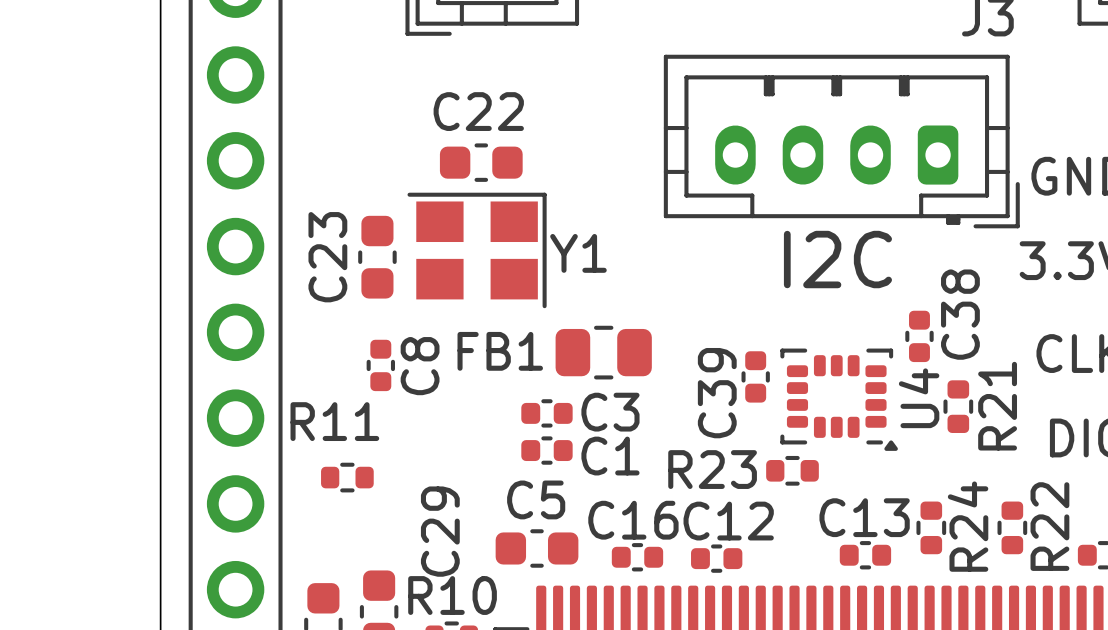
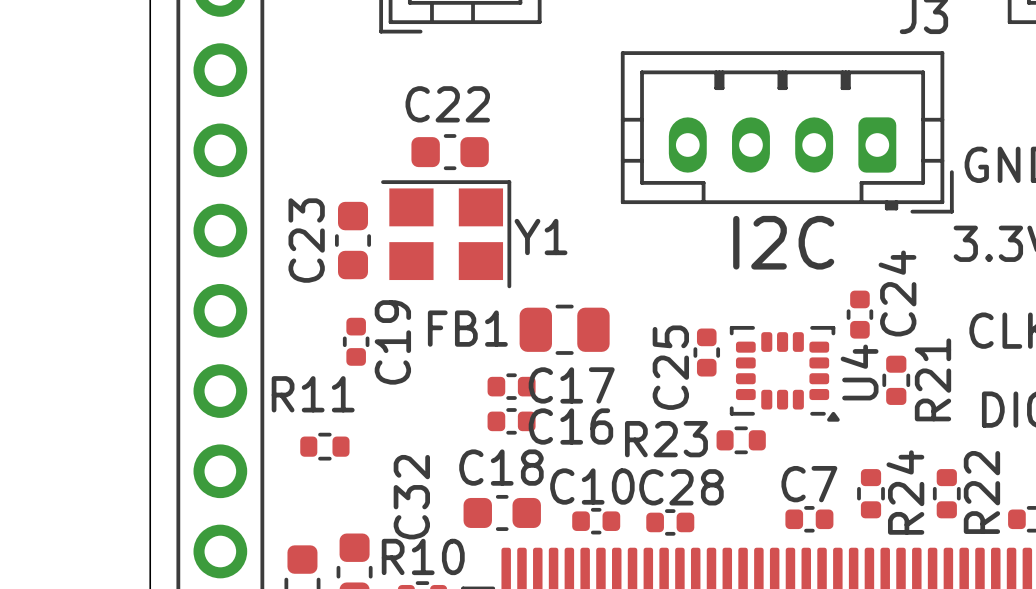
C38 name: C38 (960, 314) -> C24 (897, 293)
C8 name: C8 (420, 366) -> C19 (392, 342)
C39 name: C39 (717, 393) -> C25 (670, 367)
C3 name: C3 (610, 412) -> C17 (571, 385)
C1 name: C1 (610, 456) -> C16 (570, 426)
C5 name: C5 (536, 499) -> C18 (501, 467)
C13 name: C13 (864, 517) -> C7 (809, 484)
C16 name: C16 (633, 520) -> C10 (592, 486)
C12 name: C12 (728, 521) -> C28 (681, 487)
C29 name: C29 (440, 531) -> C32 (411, 497)

